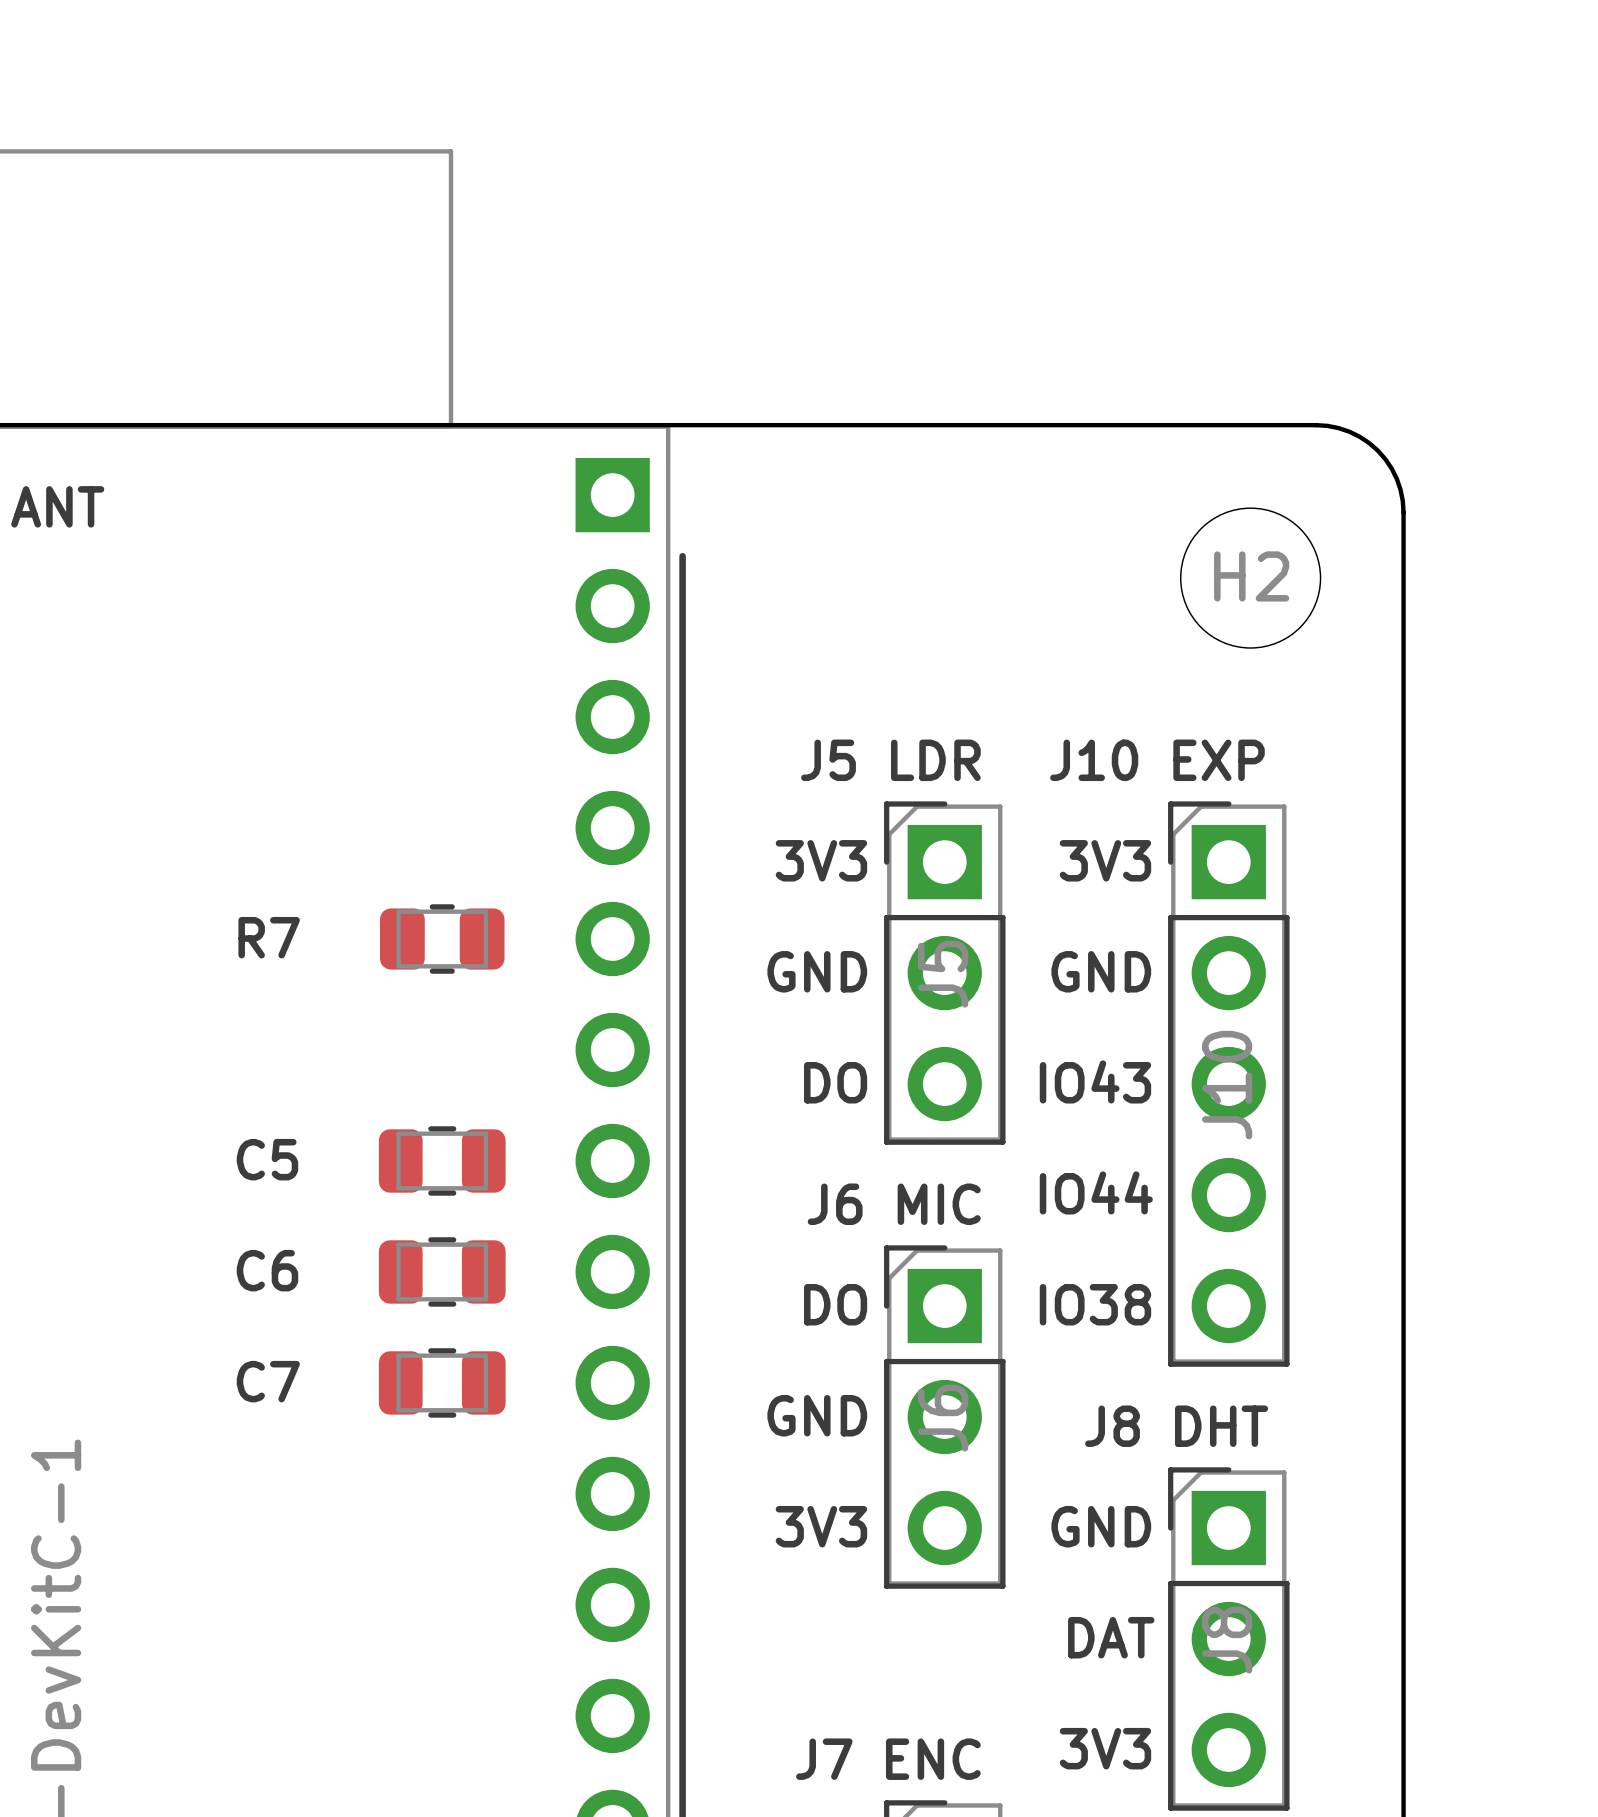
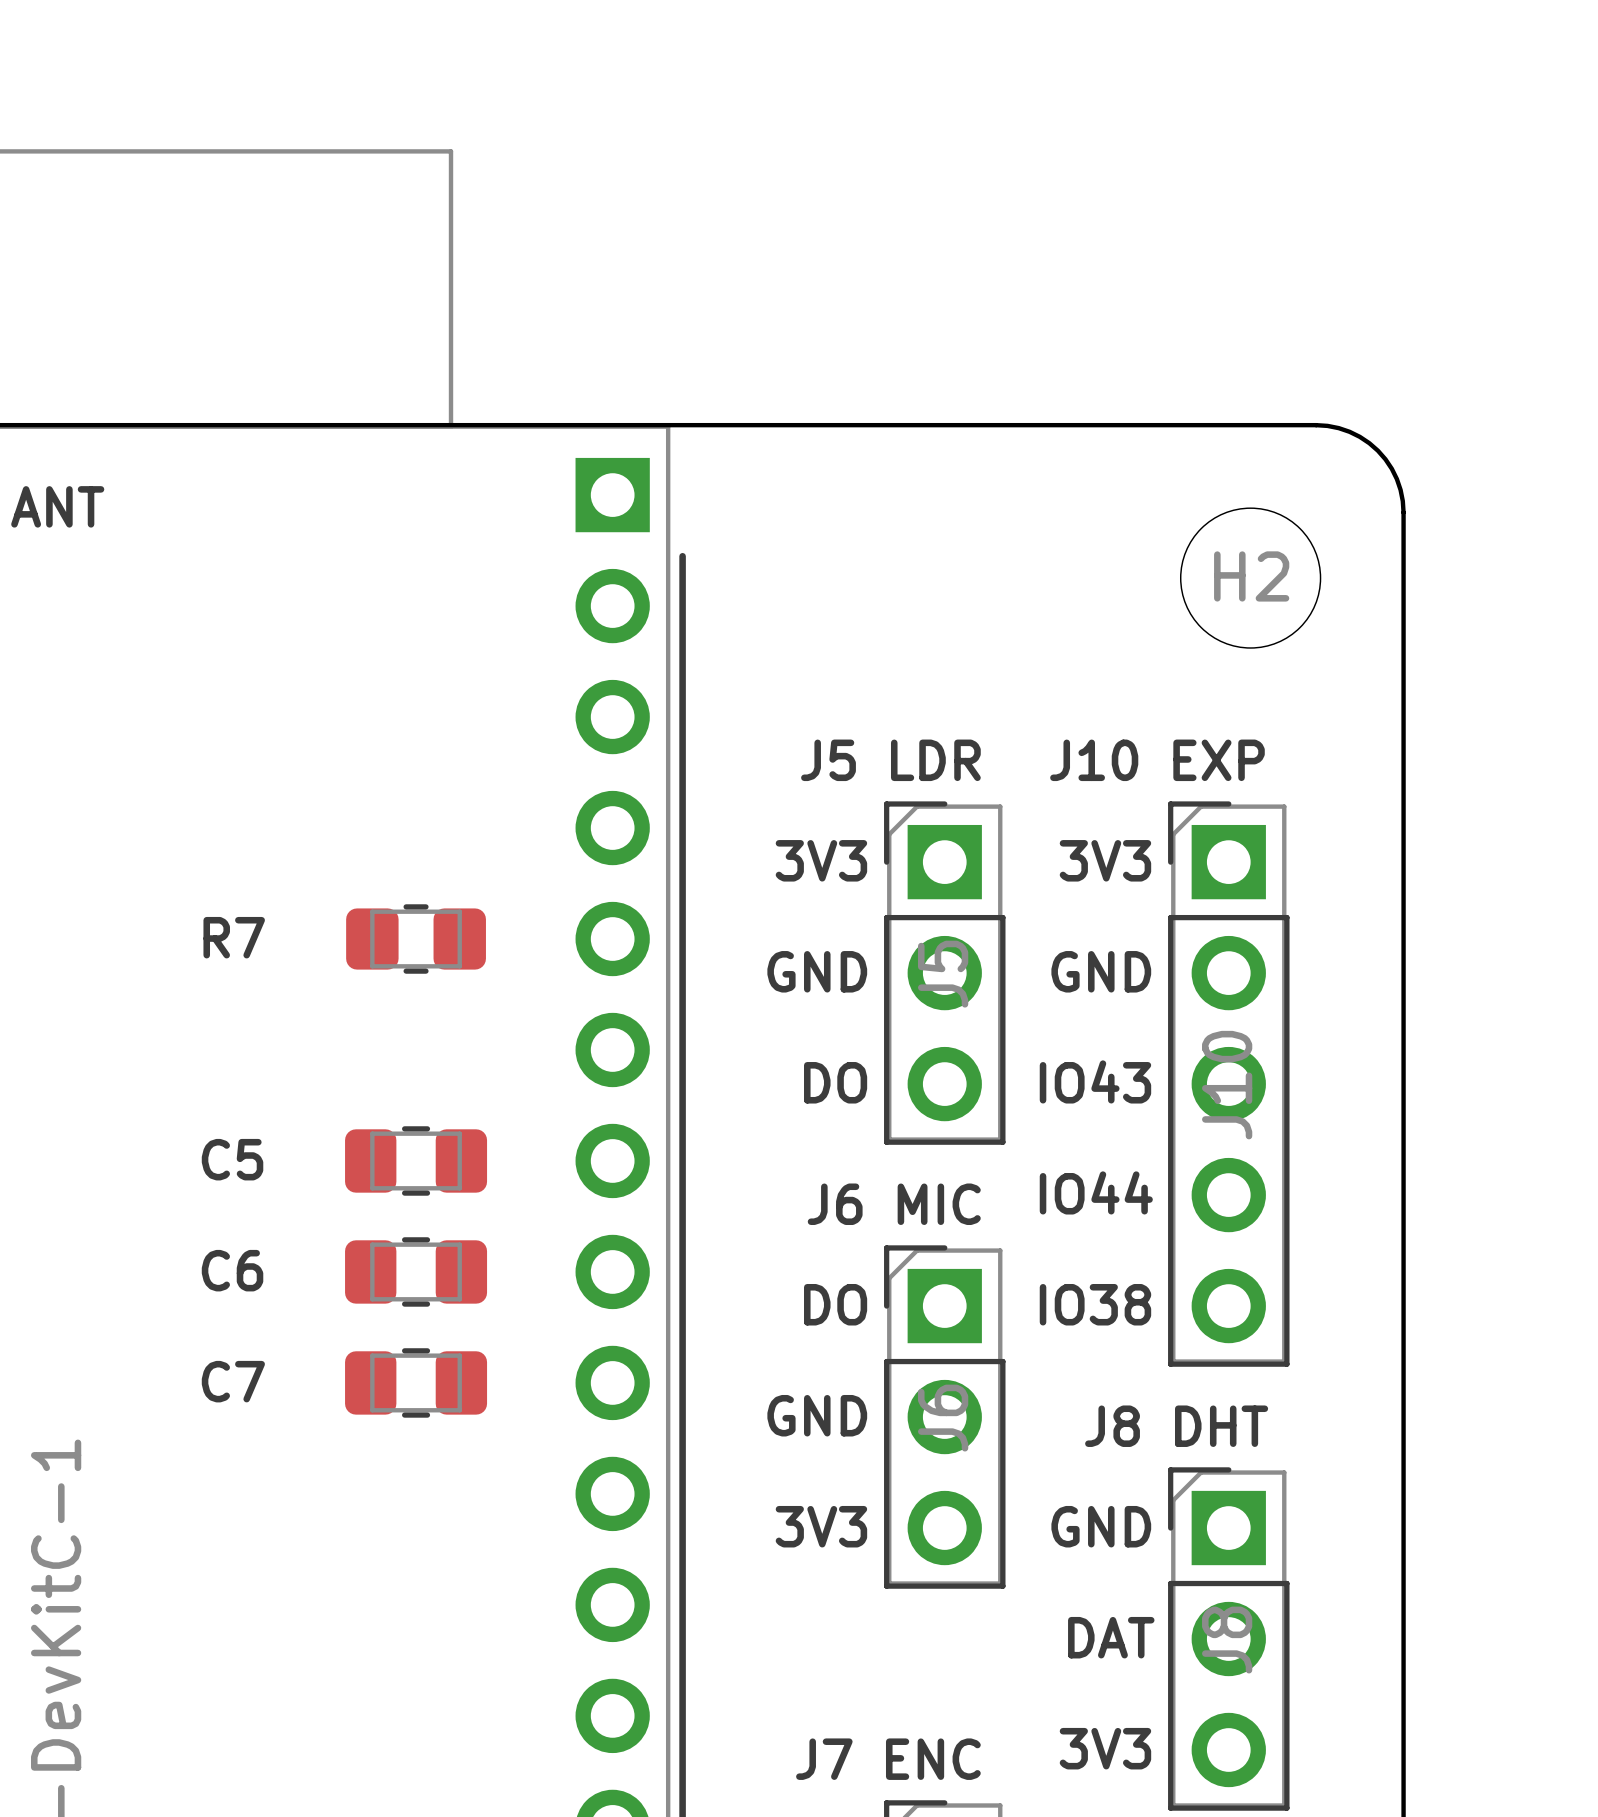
R7 footprint: [380, 904, 505, 974] -> [346, 904, 486, 974]
R7 name position: R7 (269, 937) -> R7 (234, 937)
C5 footprint: [378, 1126, 506, 1196] -> [345, 1126, 488, 1196]
C5 name position: C5 (267, 1159) -> C5 (232, 1159)
C6 footprint: [378, 1237, 506, 1307] -> [345, 1237, 488, 1307]
C6 name position: C6 (267, 1270) -> C6 (232, 1270)
C7 footprint: [378, 1348, 506, 1418] -> [345, 1348, 488, 1418]
C7 name position: C7 (268, 1381) -> C7 (233, 1381)

